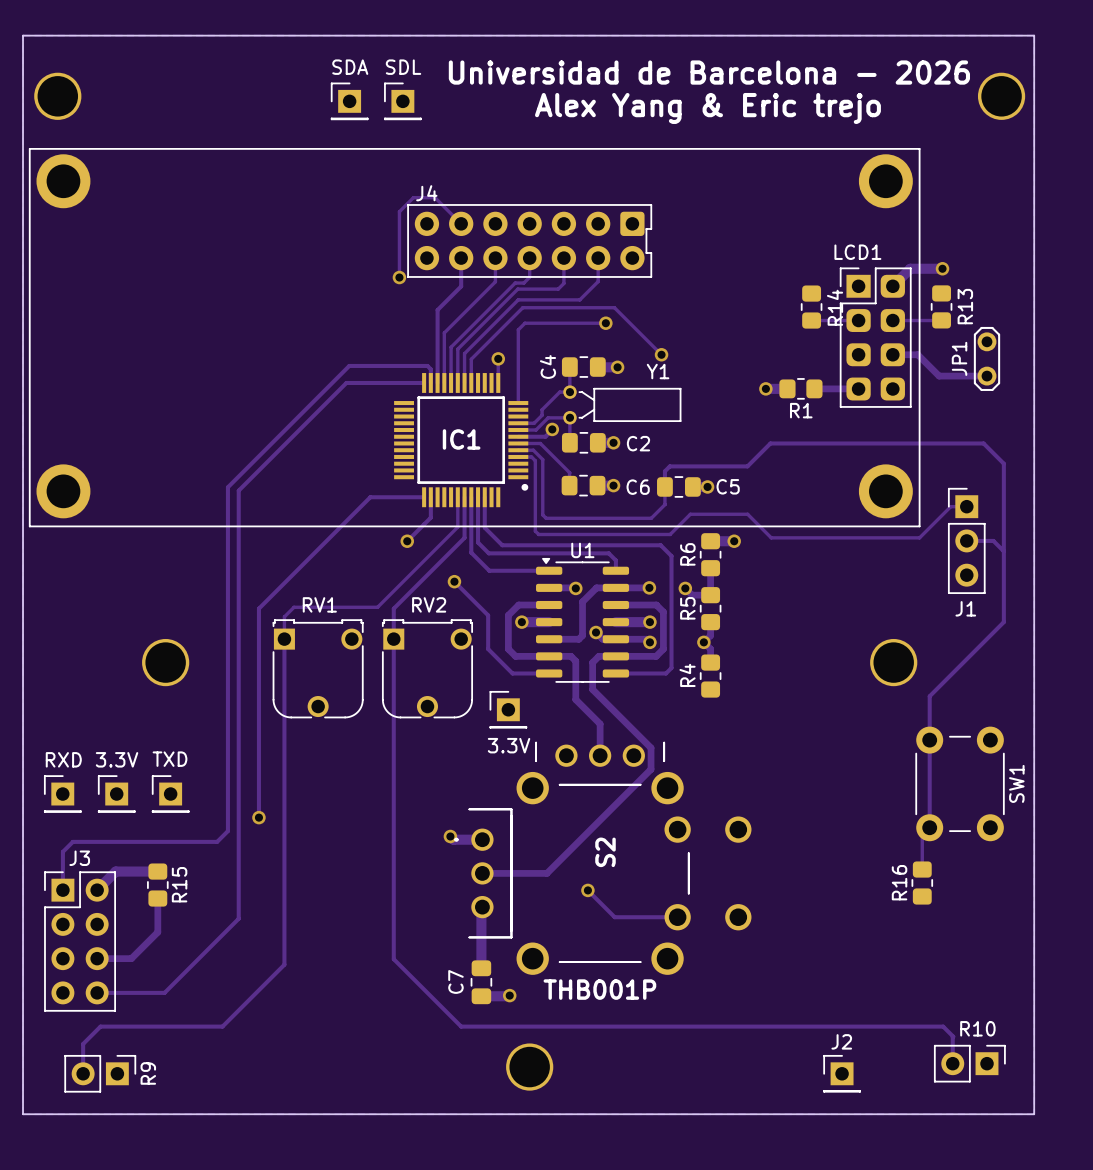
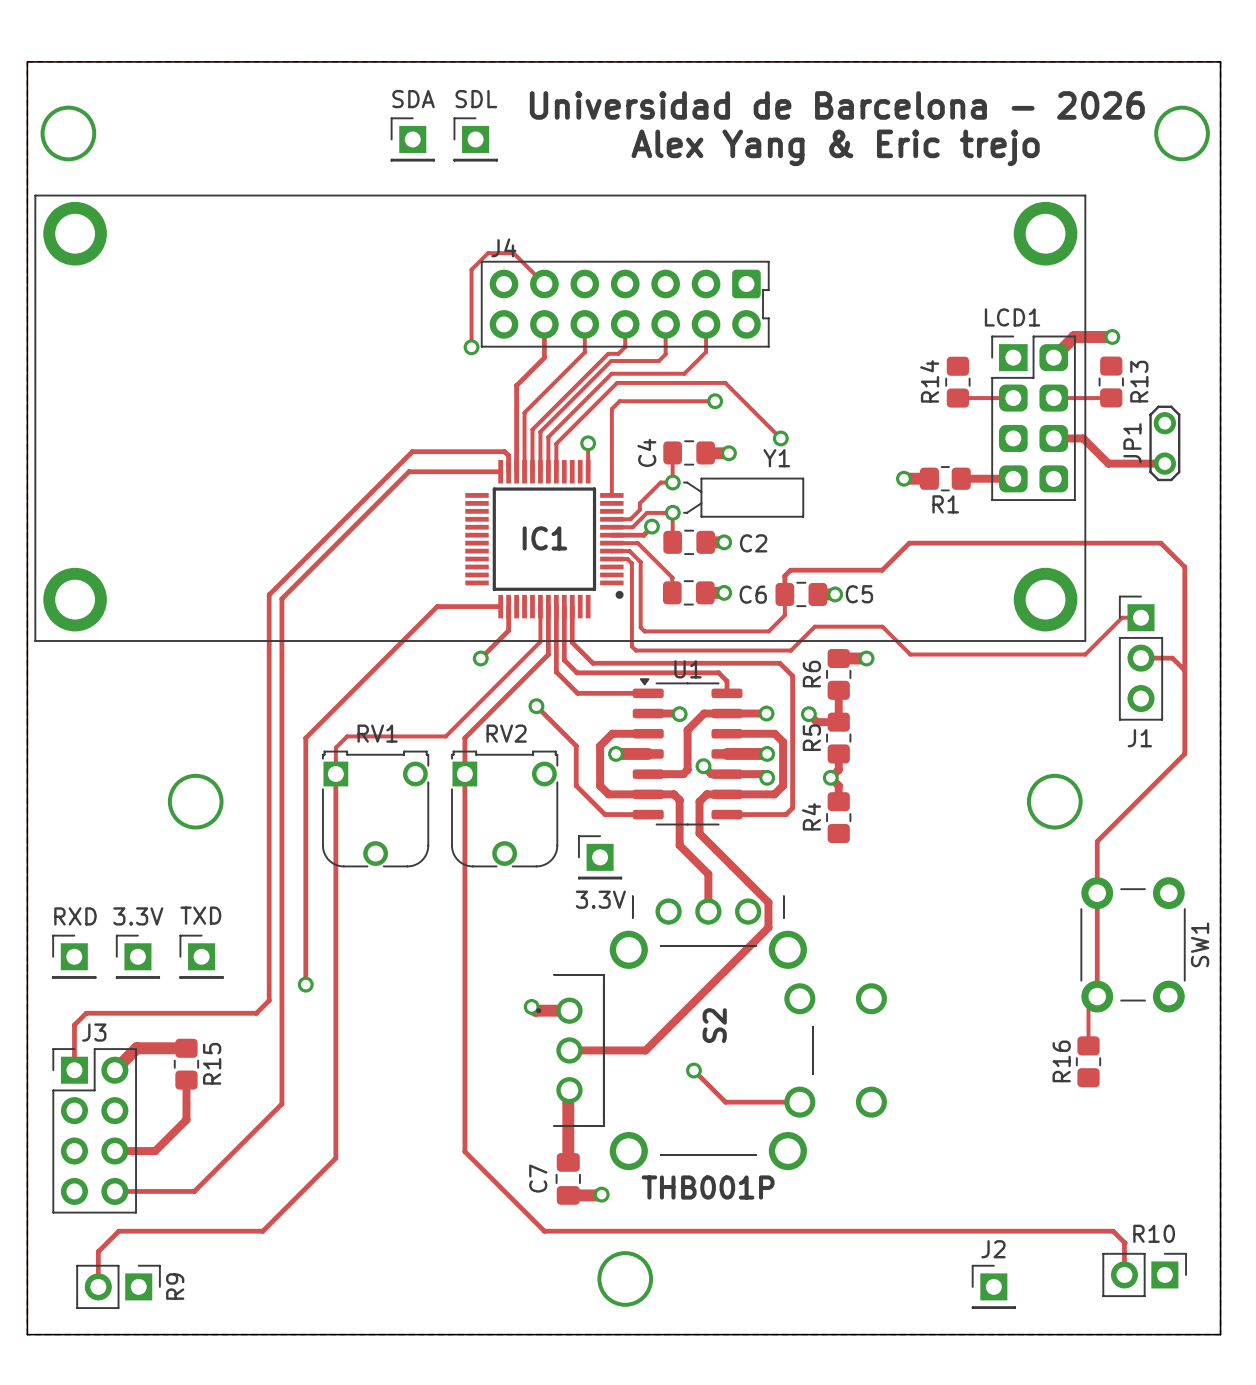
R14 name position: R14 (835, 307) -> R14 (929, 381)

